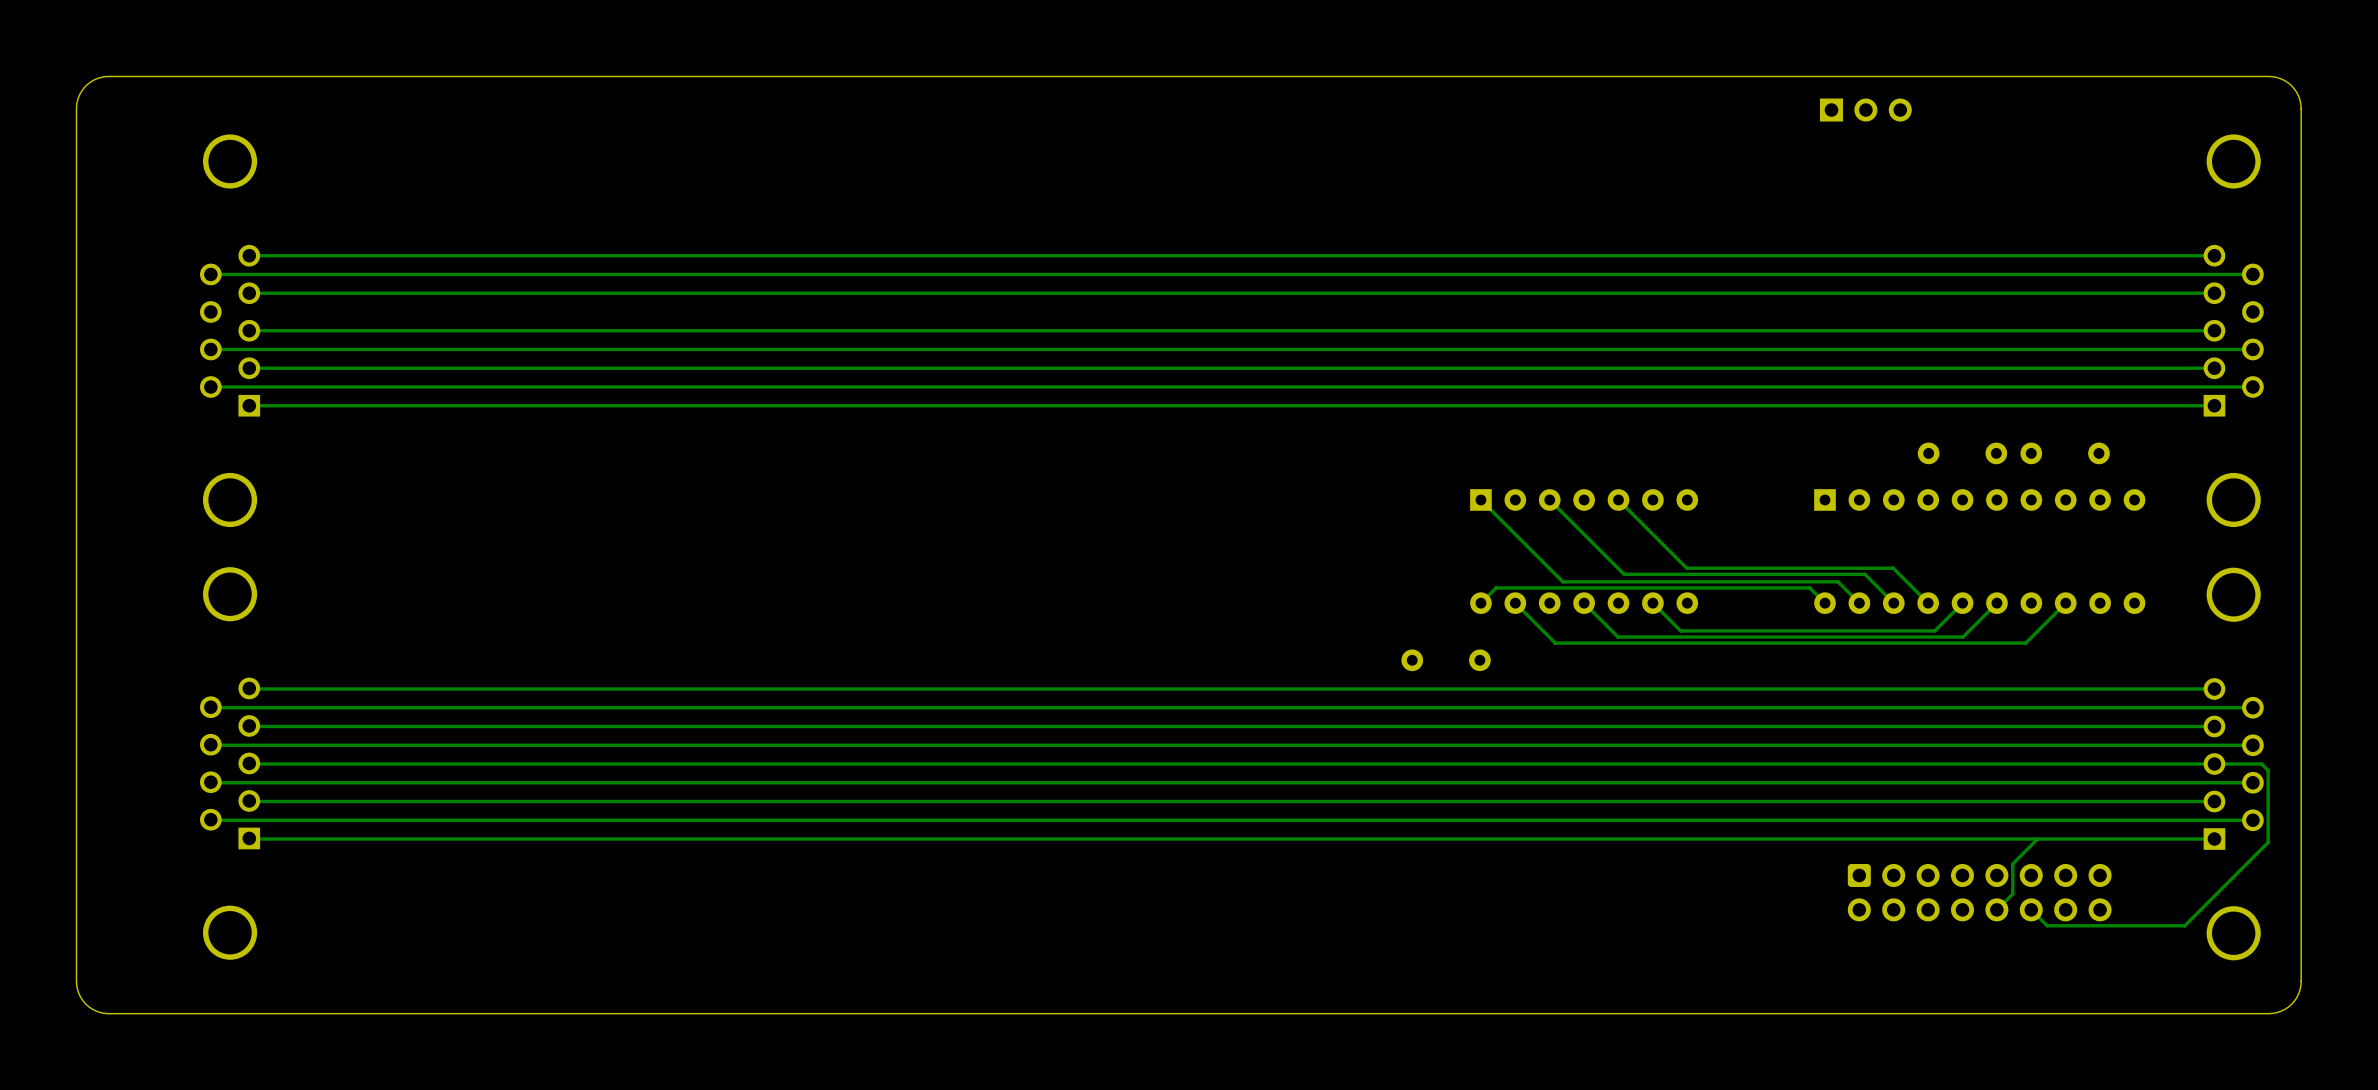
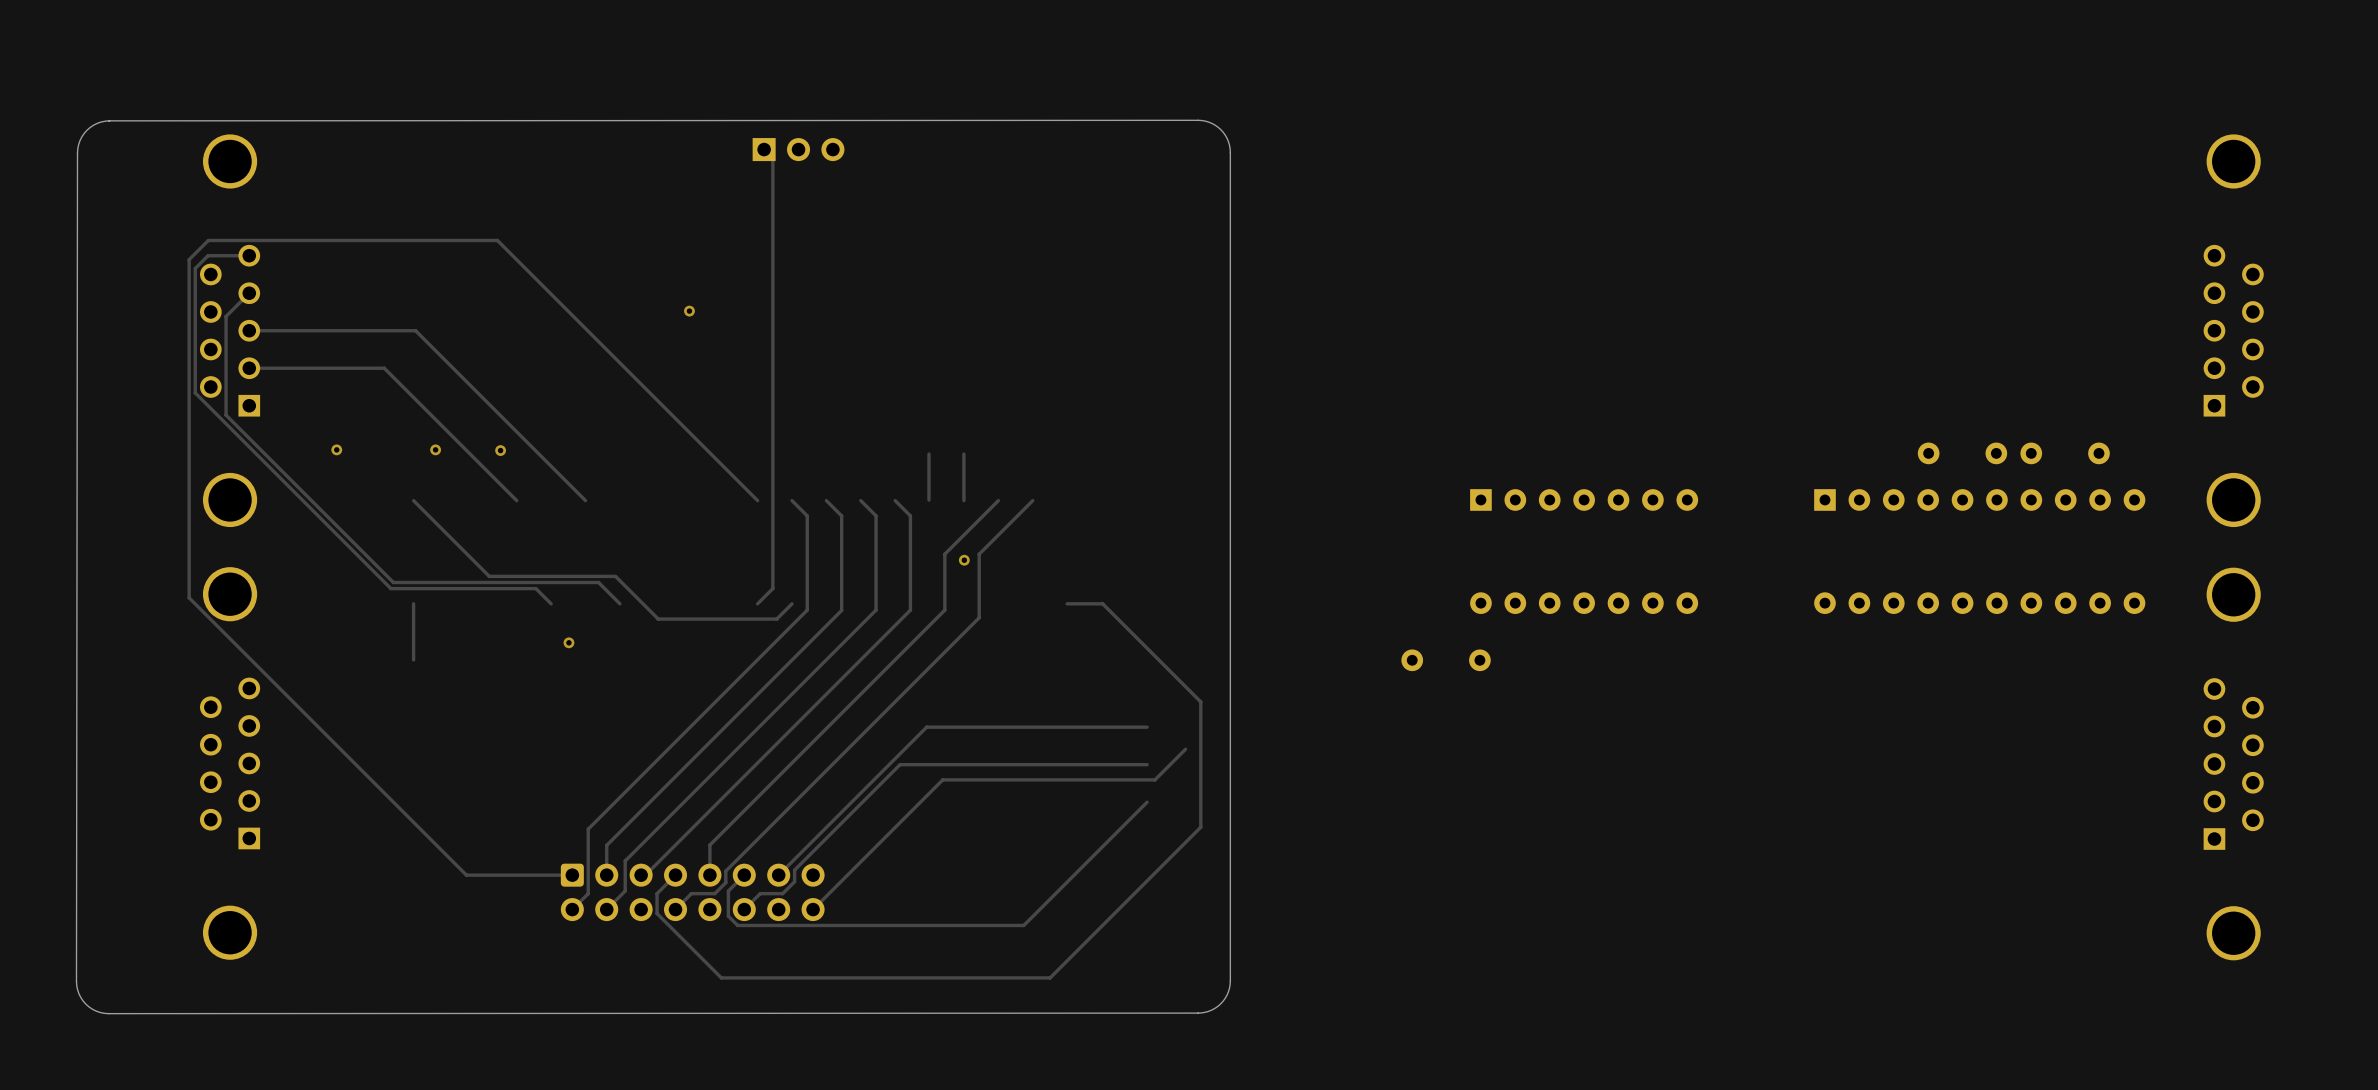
part: (1865, 110) -> none
board edge: none -> (109, 120) (97, 123) (86, 130) (79, 140) (77, 153) (76, 981)
part: none -> (798, 149)
track: none -> (772, 158) (772, 588) (757, 603)
track: (2214, 255) (249, 255) -> (551, 603) (535, 588) (390, 588) (195, 392) (195, 268) (208, 255) (249, 255)
track: (2252, 274) (210, 274) -> none
track: (2214, 293) (249, 293) -> (619, 603) (598, 582) (393, 582) (226, 415) (226, 316) (249, 293)
via: none -> (689, 311)
track: (2214, 330) (415, 330) -> (585, 500) (415, 330)
track: (2252, 349) (210, 349) -> none
track: (2214, 368) (384, 368) -> (516, 500) (384, 368)
track: (2252, 386) (210, 386) -> none
track: (2214, 405) (249, 405) -> none
via: none -> (336, 449)
via: none -> (435, 449)
via: none -> (500, 450)
track: none -> (928, 454) (928, 500)
track: none -> (963, 454) (963, 500)
track: (1480, 499) (1562, 581) (1838, 581) (1859, 603) -> none
track: (1549, 499) (1624, 574) (1864, 574) (1893, 603) -> none
track: (1618, 499) (1686, 568) (1893, 568) (1928, 603) -> none
track: none -> (413, 500) (489, 576) (615, 576) (658, 619) (776, 619) (792, 603)
track: none -> (757, 500) (497, 240) (208, 240) (189, 259) (189, 597) (466, 875) (572, 875)
track: none -> (792, 500) (807, 515) (807, 610) (588, 829) (588, 893) (572, 909)
track: none -> (826, 500) (841, 515) (841, 610) (606, 845) (606, 875)
track: none -> (860, 500) (876, 515) (876, 610) (625, 860) (625, 891) (606, 909)
track: none -> (895, 500) (910, 515) (910, 610) (645, 875)
track: none -> (998, 500) (944, 554) (944, 610) (709, 845) (709, 875)
track: none -> (1032, 500) (979, 554) (979, 617) (725, 871) (725, 882) (714, 893) (691, 893) (675, 909)
via: none -> (964, 560)
track: none -> (413, 603) (413, 659)
track: none -> (1067, 603) (1102, 603) (1200, 701) (1200, 827) (1050, 977) (721, 977) (657, 913) (657, 893) (675, 875)
track: (1824, 603) (1809, 587) (1496, 587) (1480, 603) -> none
track: (1962, 603) (1934, 630) (1680, 630) (1652, 603) -> none
track: (1996, 603) (1963, 637) (1617, 637) (1584, 603) -> none
track: (2065, 603) (2025, 643) (1555, 643) (1515, 603) -> none
via: none -> (568, 642)
track: (2214, 688) (249, 688) -> none
track: (2252, 707) (211, 707) -> none
track: (2214, 726) (249, 726) -> none
track: none -> (1147, 727) (926, 727) (778, 875)
track: (2252, 745) (211, 745) -> none
track: none -> (1185, 749) (1154, 779) (942, 779) (813, 909)
track: (249, 764) (2261, 764) (2268, 770) (2268, 842) (2184, 925) (2047, 925) (2031, 909) -> none
track: none -> (1147, 764) (900, 764) (794, 870) (794, 881) (782, 893) (760, 893) (744, 909)
track: (2252, 782) (211, 782) -> none
track: (2214, 801) (249, 801) -> none
track: none -> (1147, 802) (1023, 925) (737, 925) (728, 916) (728, 891) (744, 875)
track: (2252, 820) (211, 820) -> none
track: (2037, 839) (2012, 863) (2012, 893) (1996, 909) -> none
track: (2214, 839) (249, 839) -> none
part: none -> (692, 892)
part: (1979, 892) -> none
board edge: (76, 981) (76, 108) (78, 98) (83, 88) (98, 78) (108, 76) (2268, 76) (2285, 80) (2294, 89) (2298, 96) (2301, 108) (2301, 981) (2298, 993) (2294, 1001) (2281, 1011) (2268, 1013) (108, 1013) -> (108, 120) (1198, 120) (1208, 122) (1218, 127) (1227, 138) (1230, 152) (1230, 980) (1227, 994) (1220, 1003) (1208, 1011) (1198, 1013) (108, 1013)

